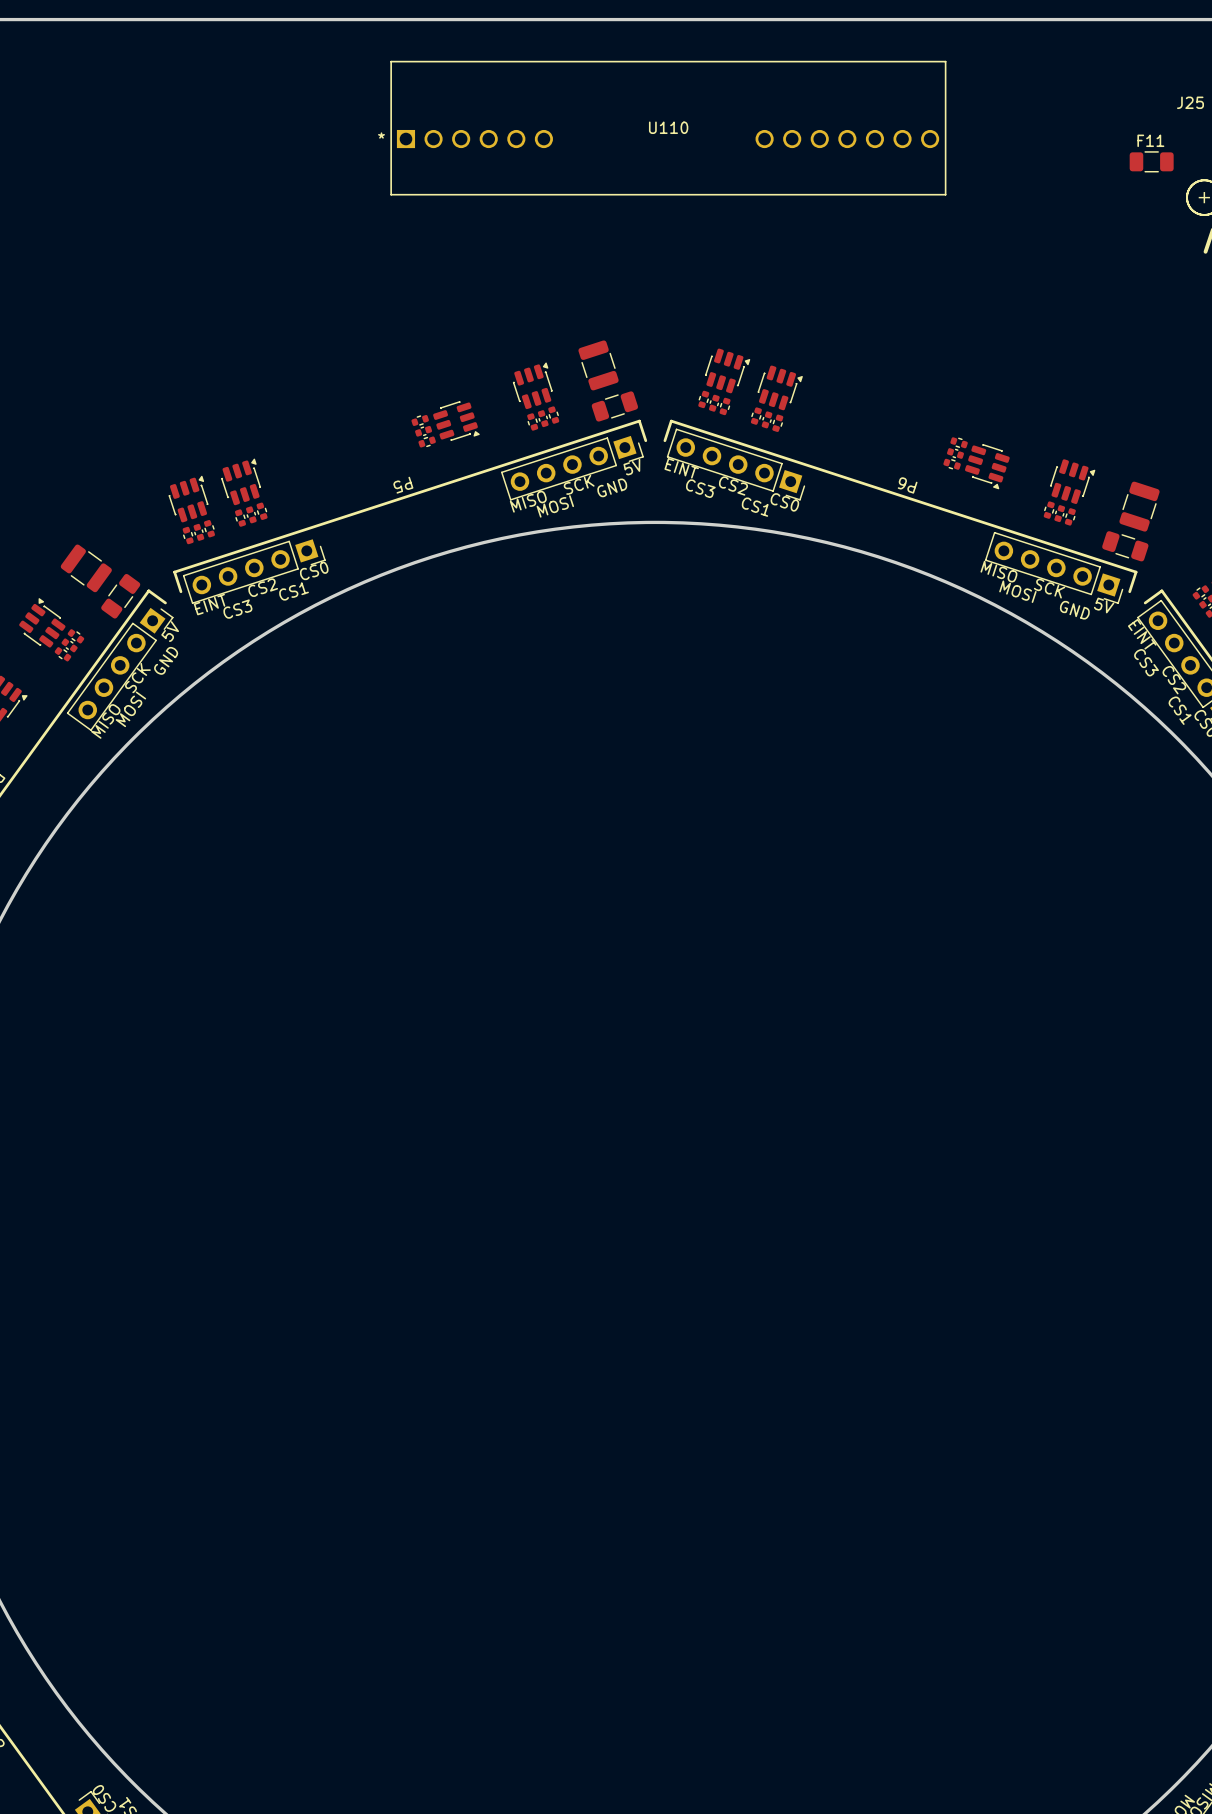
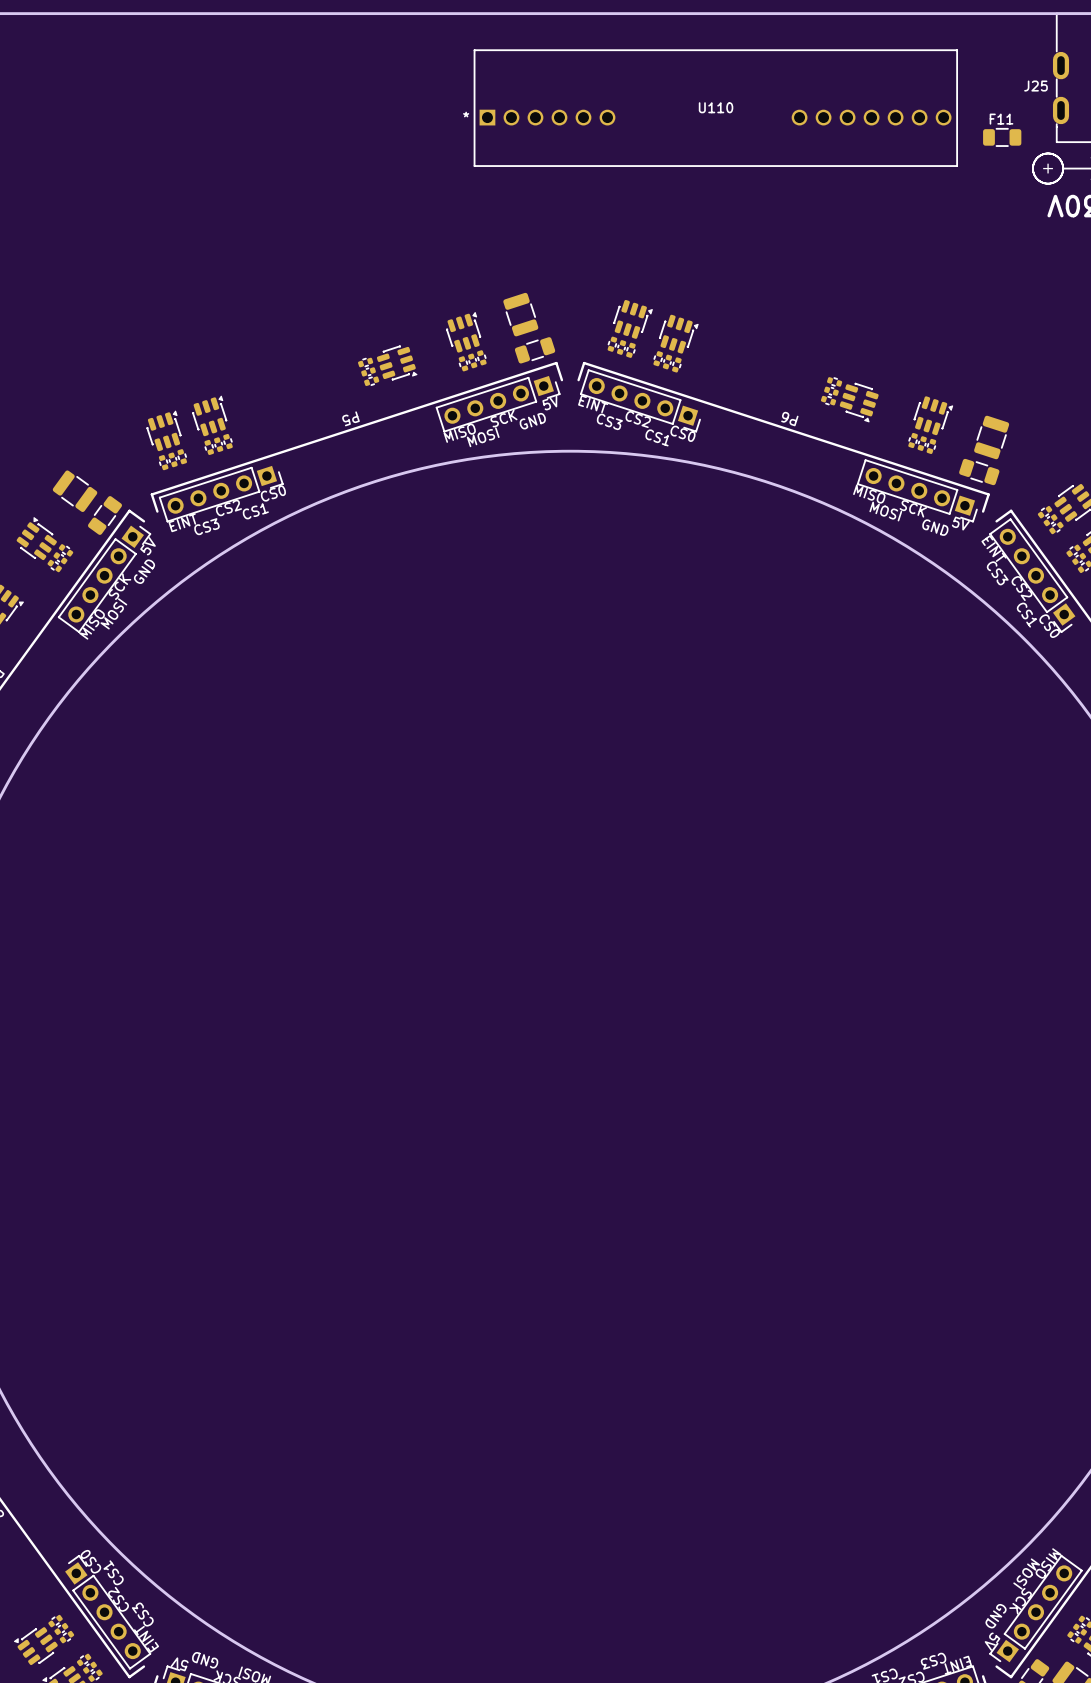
U110 position: (668, 128) -> (715, 108)

